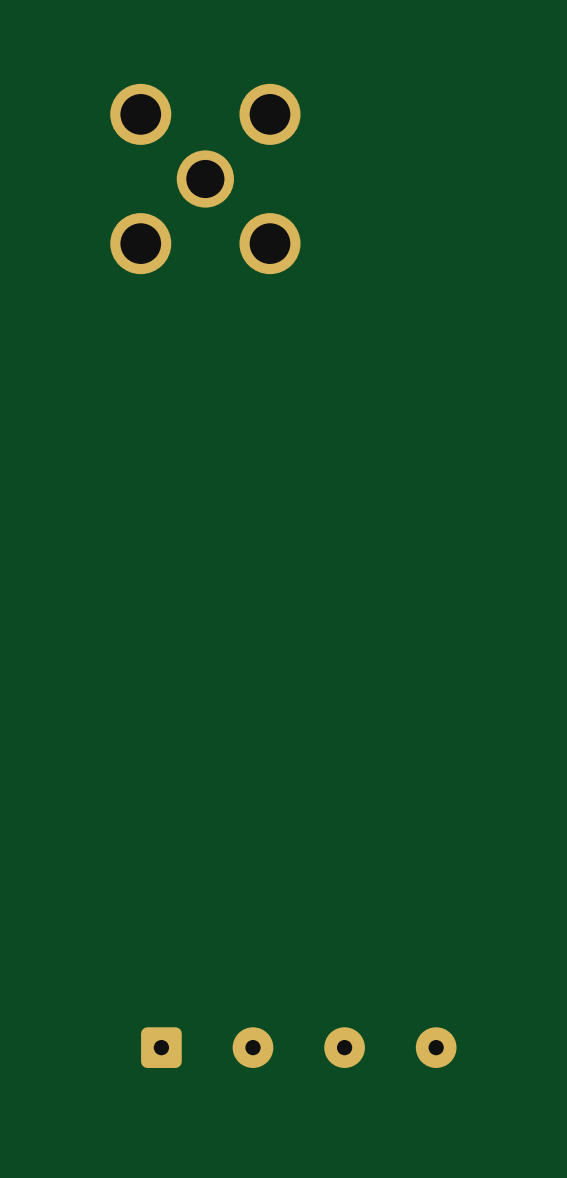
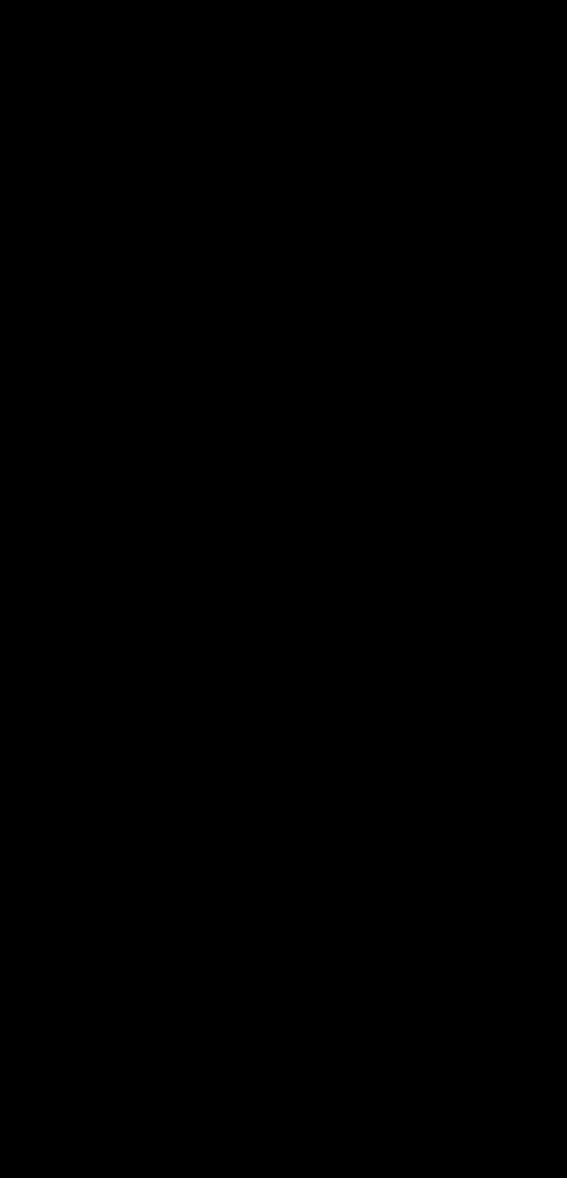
part: (205, 179) -> none
part: (298, 1047) -> none

